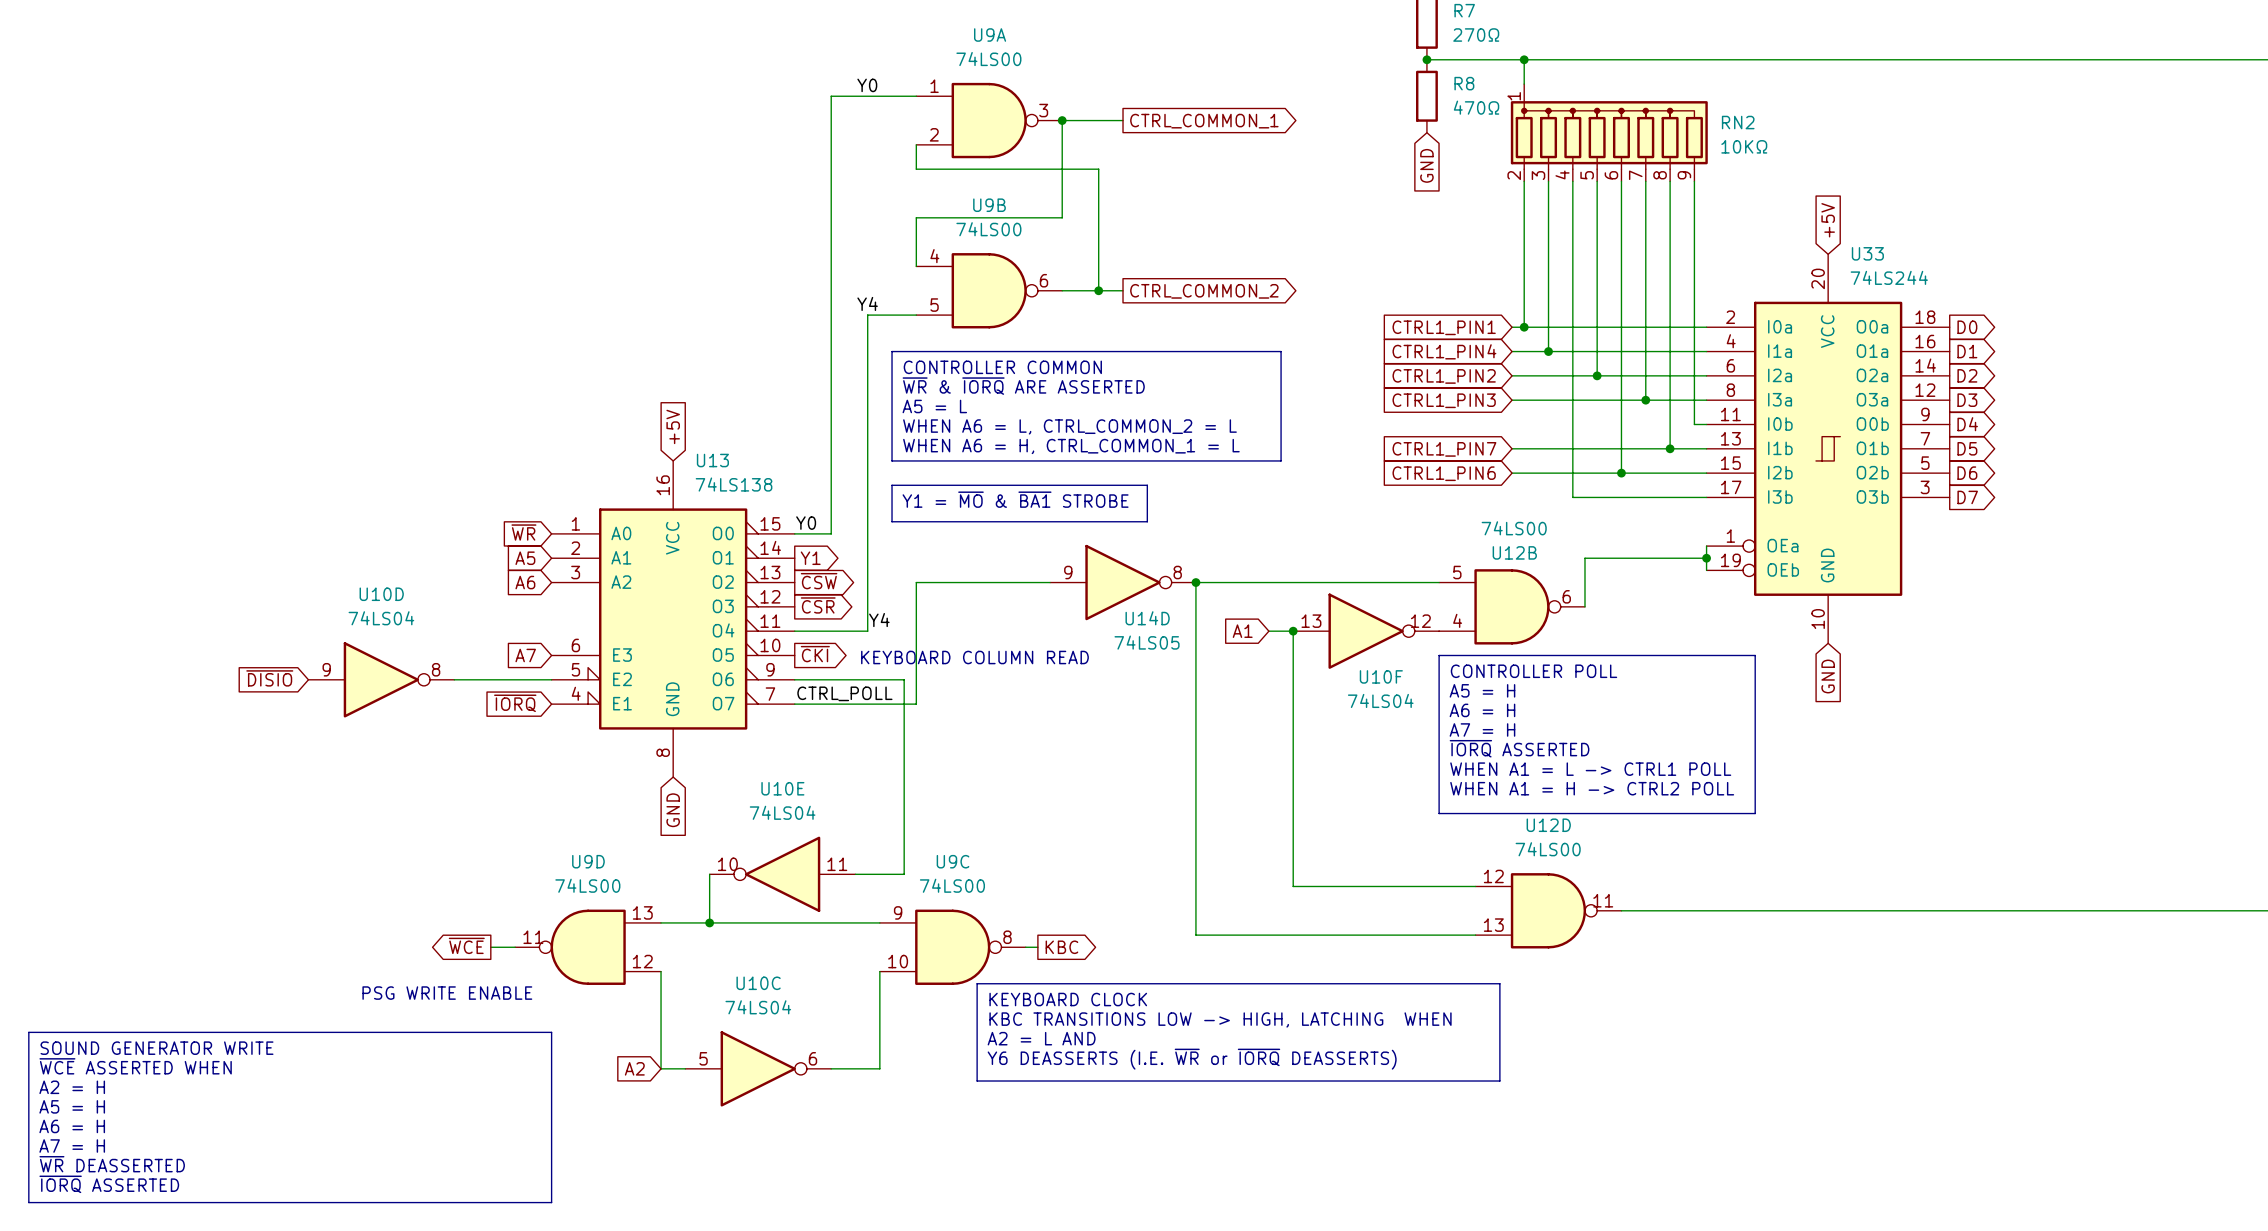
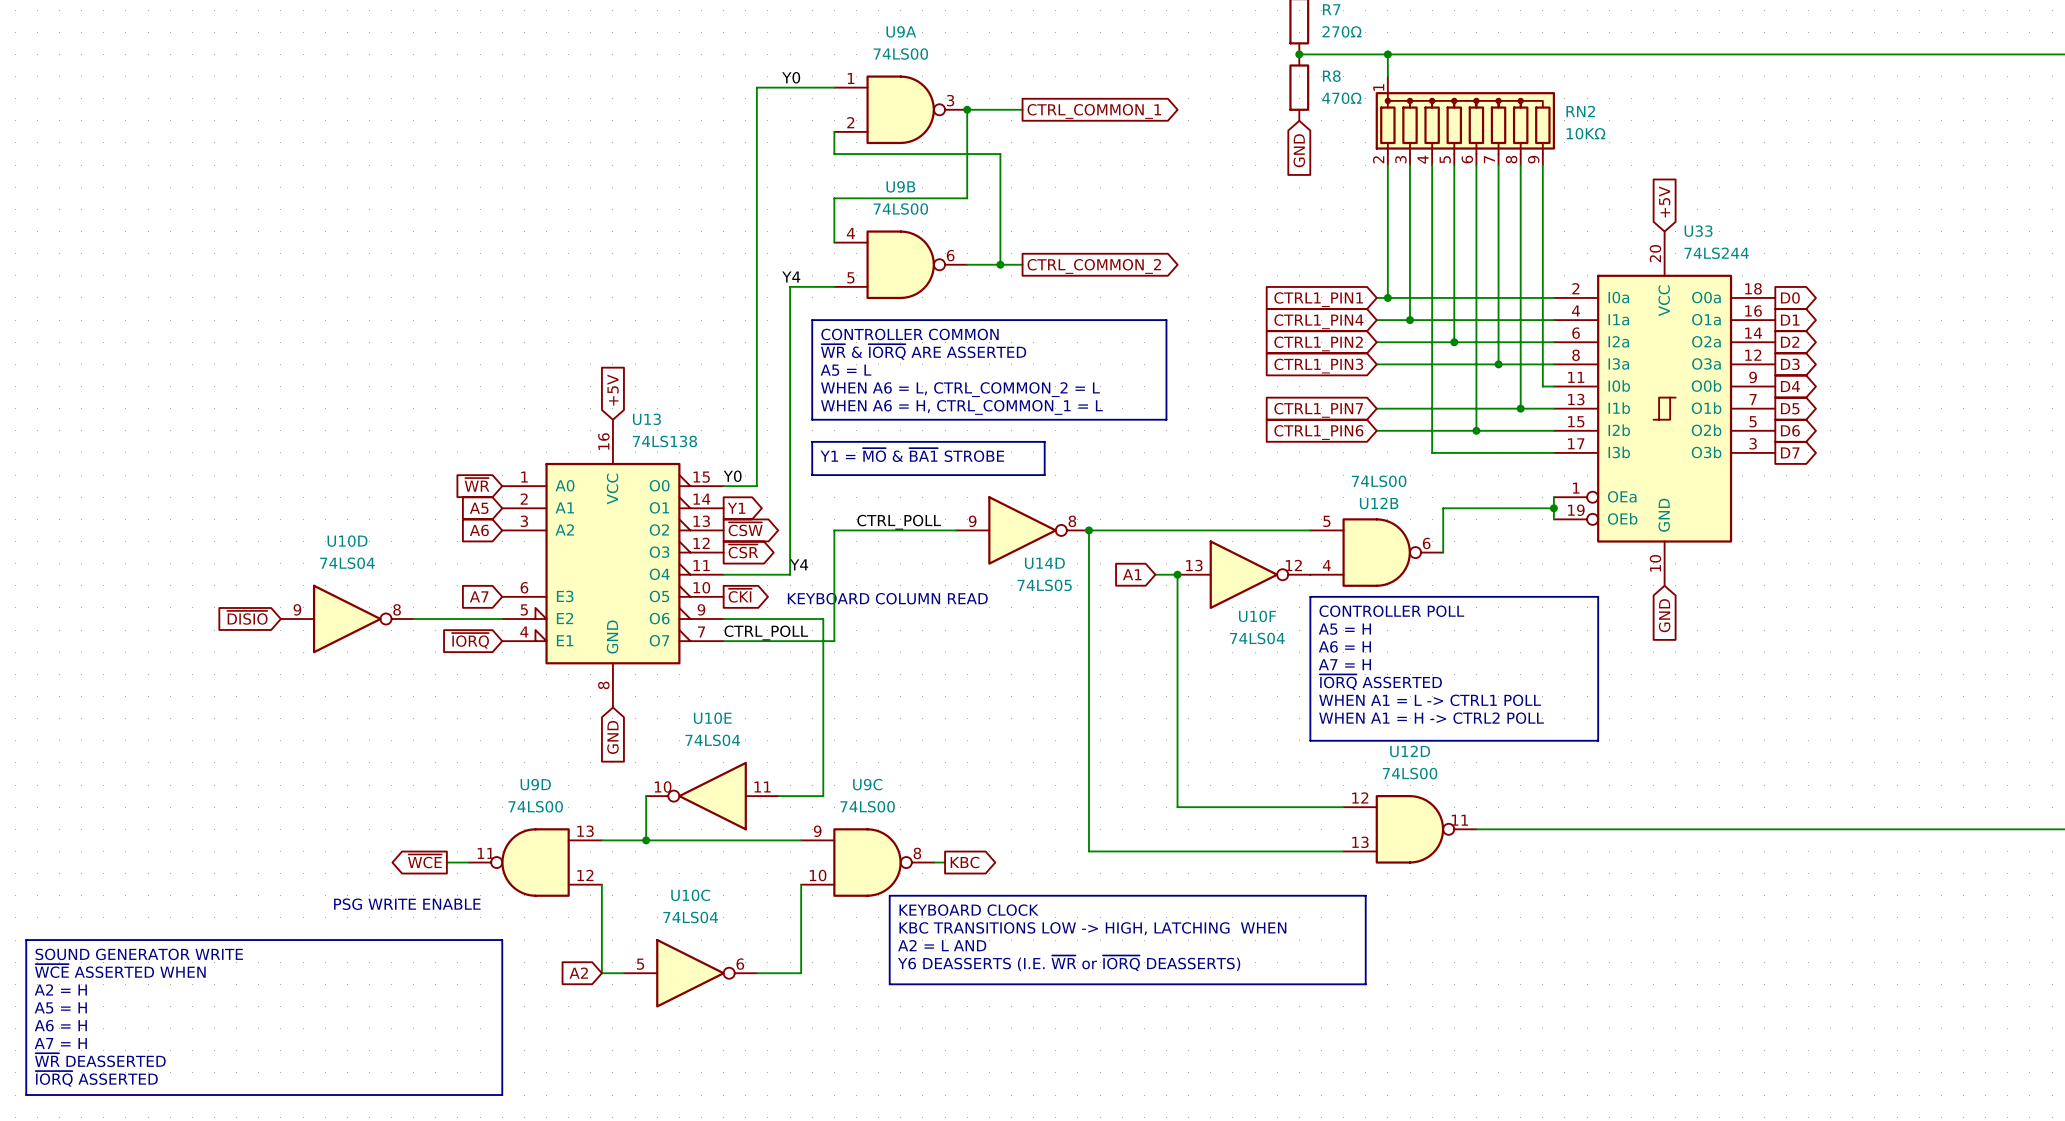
label: none -> CTRL_POLL (899, 522)

